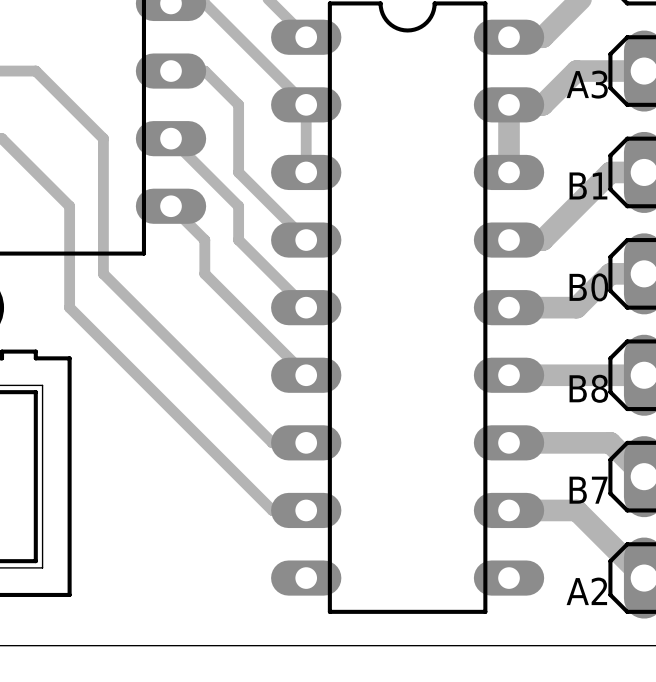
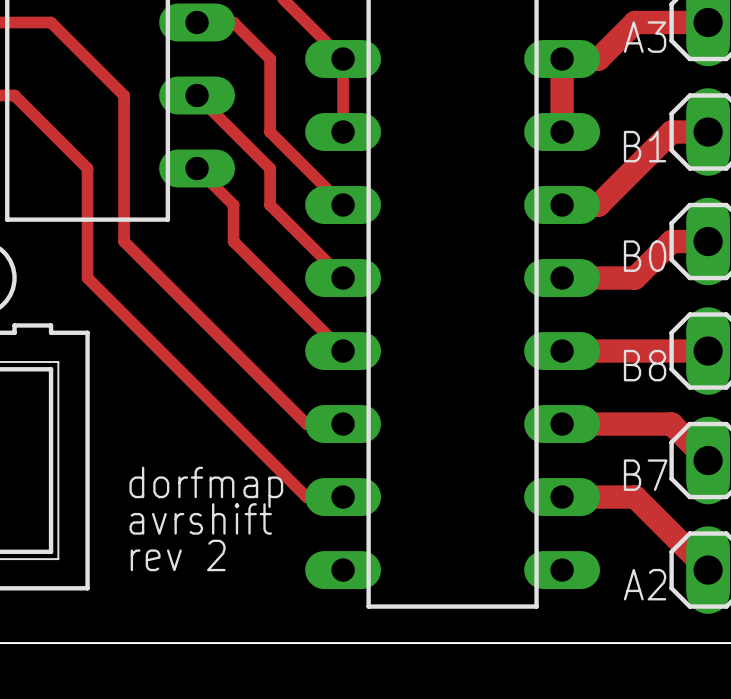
text: none -> dorfmap (206, 487)
text: none -> avrshift (200, 518)
text: none -> rev 2 (178, 555)

